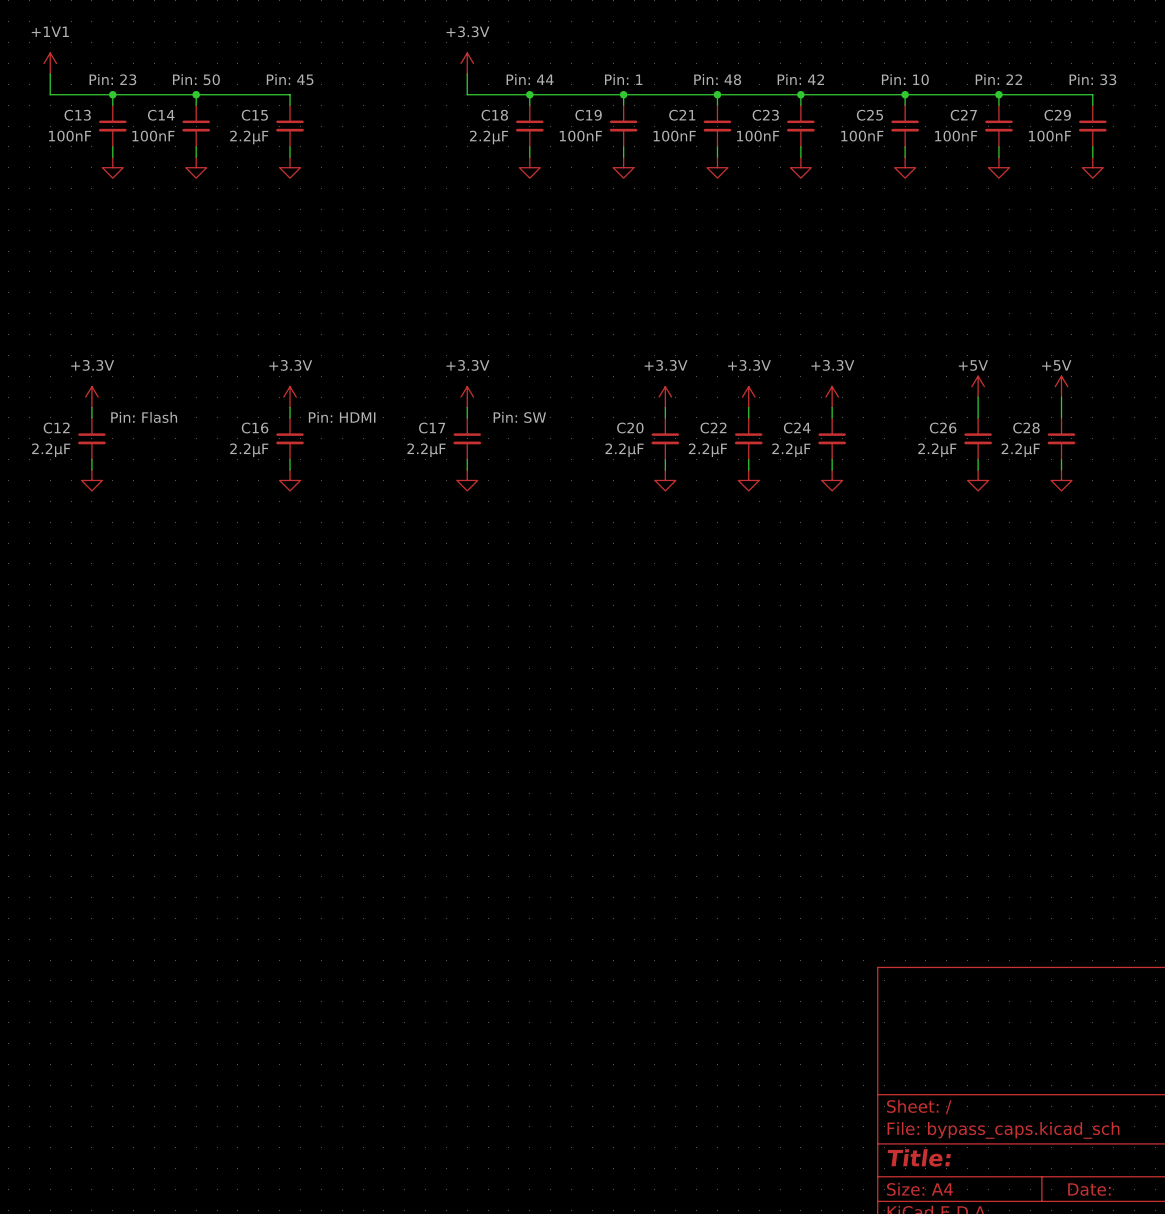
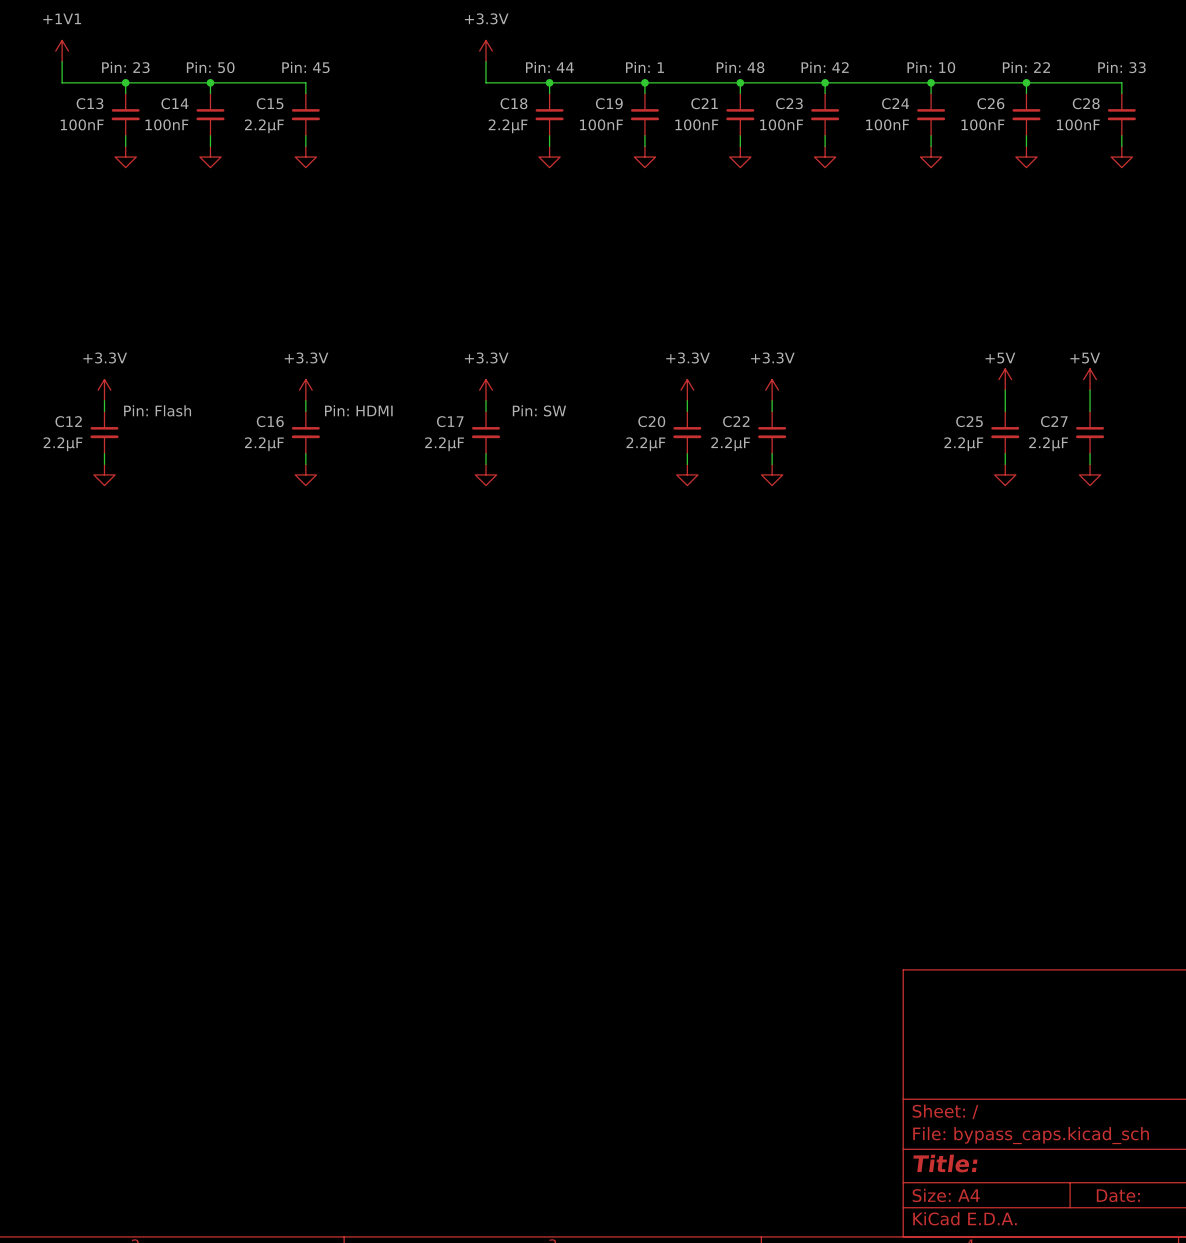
C25 name: C25 (869, 115) -> C24 (895, 103)
C27 name: C27 (963, 115) -> C26 (990, 103)
C29 name: C29 (1057, 115) -> C28 (1086, 103)
power symbol: +3.3V (832, 397) -> none
wire: (832, 407) (832, 417) -> none
C26 name: C26 (943, 428) -> C25 (969, 421)
C28 name: C28 (1026, 428) -> C27 (1054, 421)
C24: 2.2μF (832, 438) -> none
wire: (832, 459) (832, 470) -> none
power symbol: (832, 480) -> none

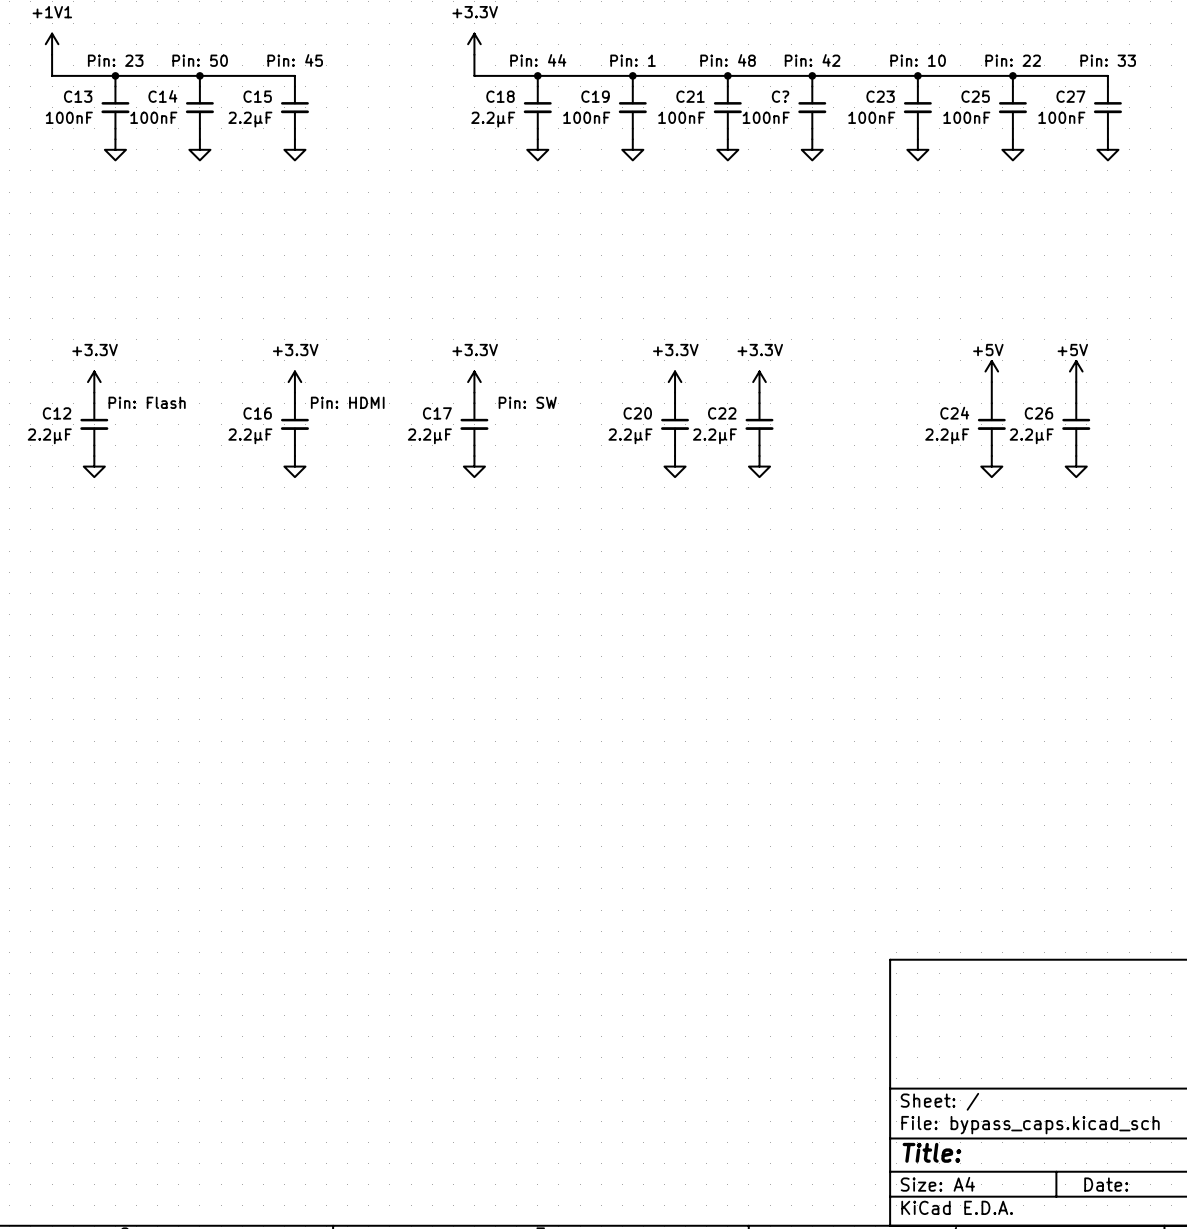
C23 name: C23 (789, 103) -> C? (780, 96)
C24 name: C24 (895, 103) -> C23 (880, 96)
C26 name: C26 (990, 103) -> C25 (975, 96)
C28 name: C28 (1086, 103) -> C27 (1070, 96)
C25 name: C25 (969, 421) -> C24 (954, 413)
C27 name: C27 (1054, 421) -> C26 (1038, 413)

